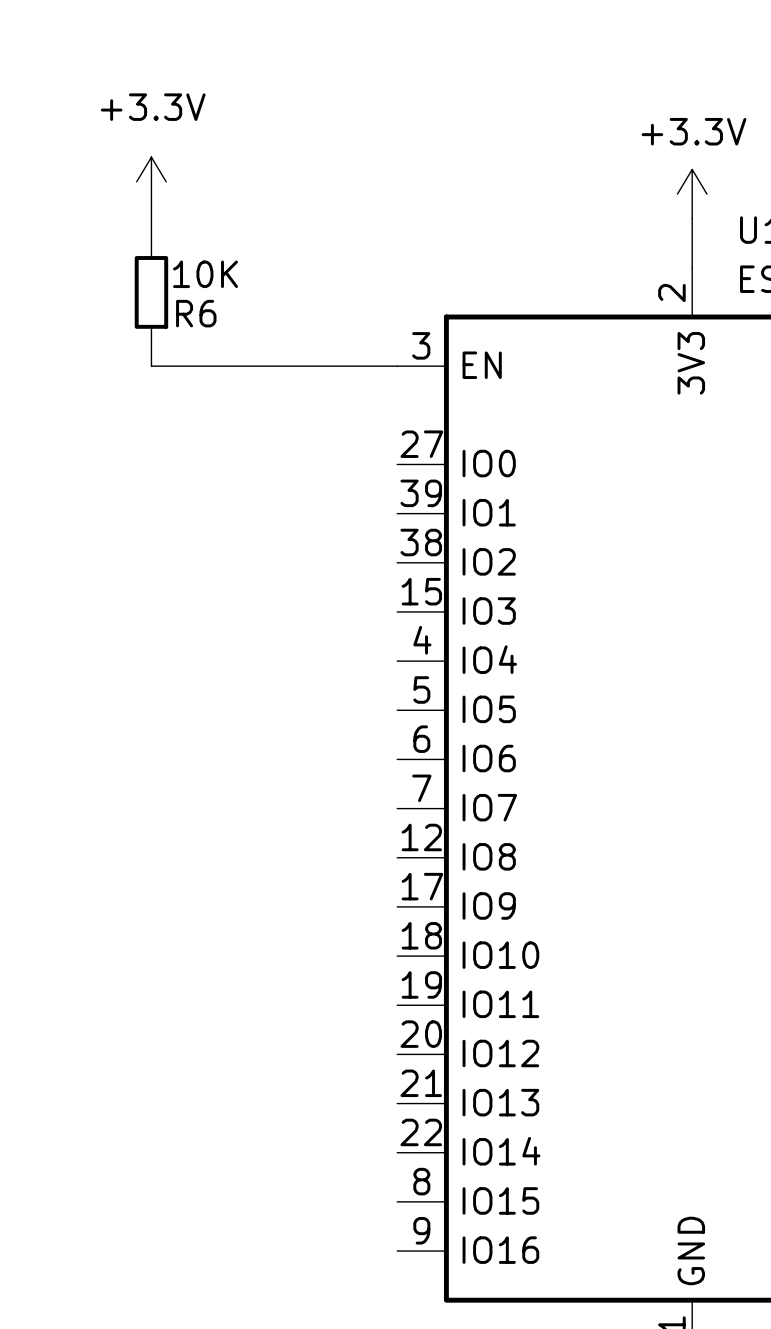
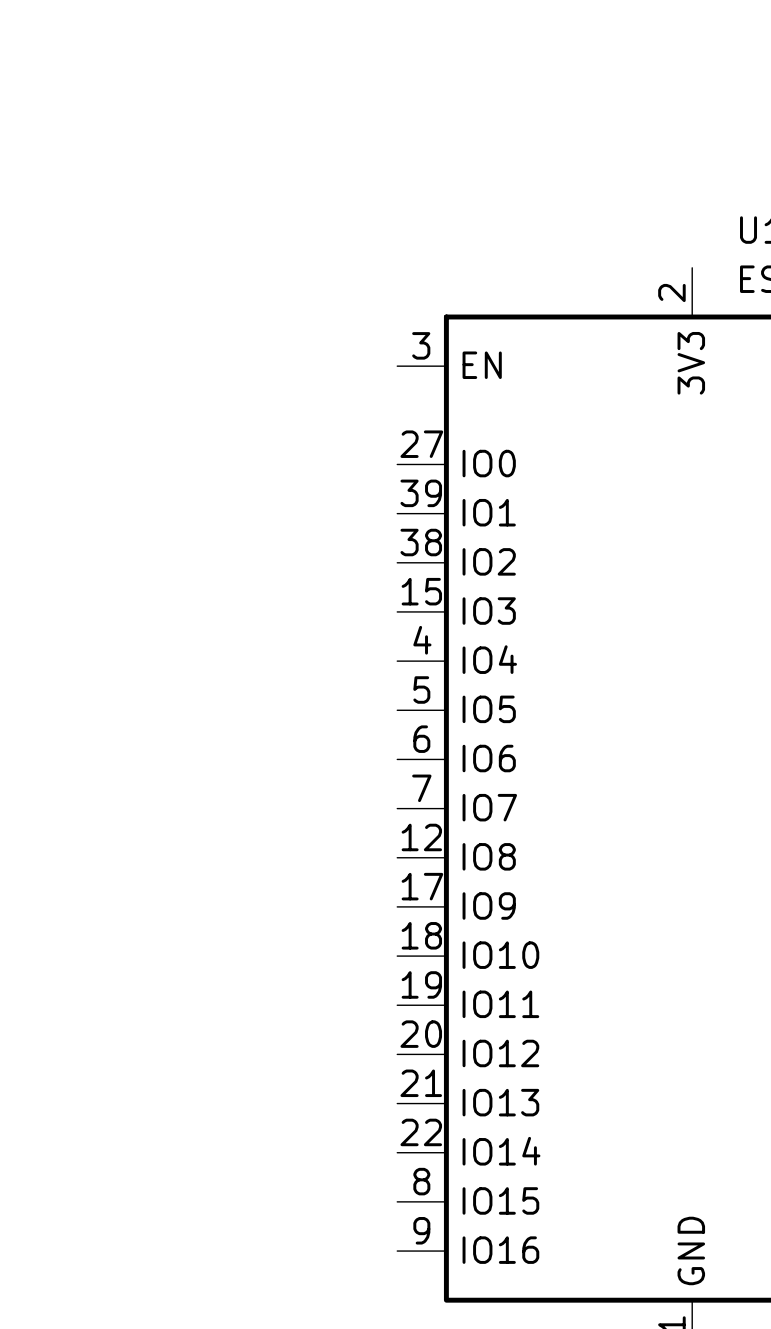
power symbol: +3.3V (151, 181) -> none
power symbol: +3.3V (692, 194) -> none
wire: (151, 206) (151, 243) -> none
wire: (692, 218) (692, 267) -> none
R6: 10K (151, 292) -> none
wire: (151, 341) (151, 366) (397, 366) -> none

